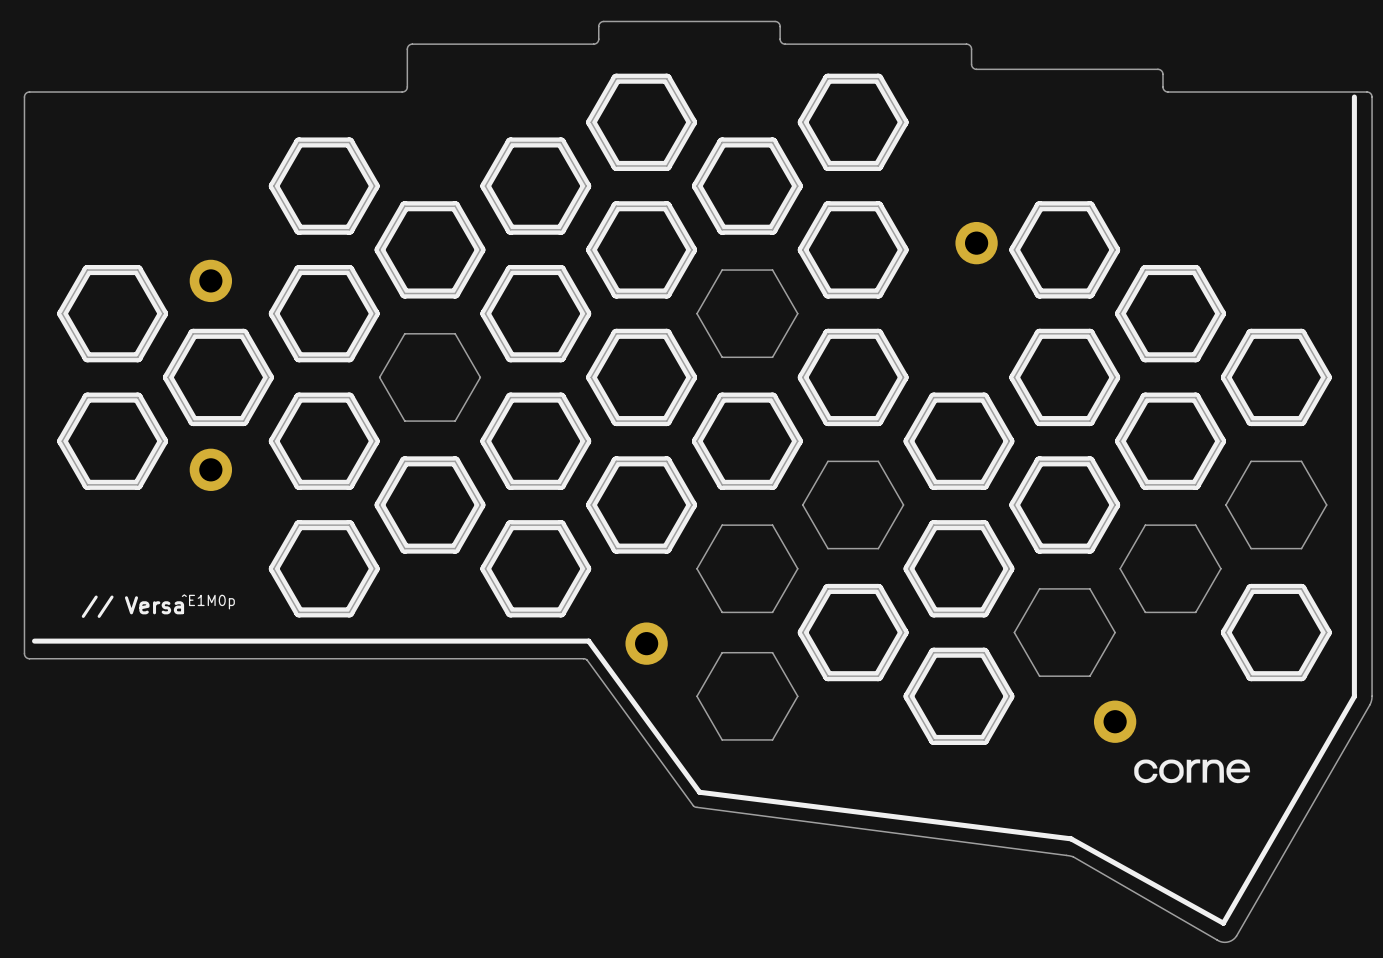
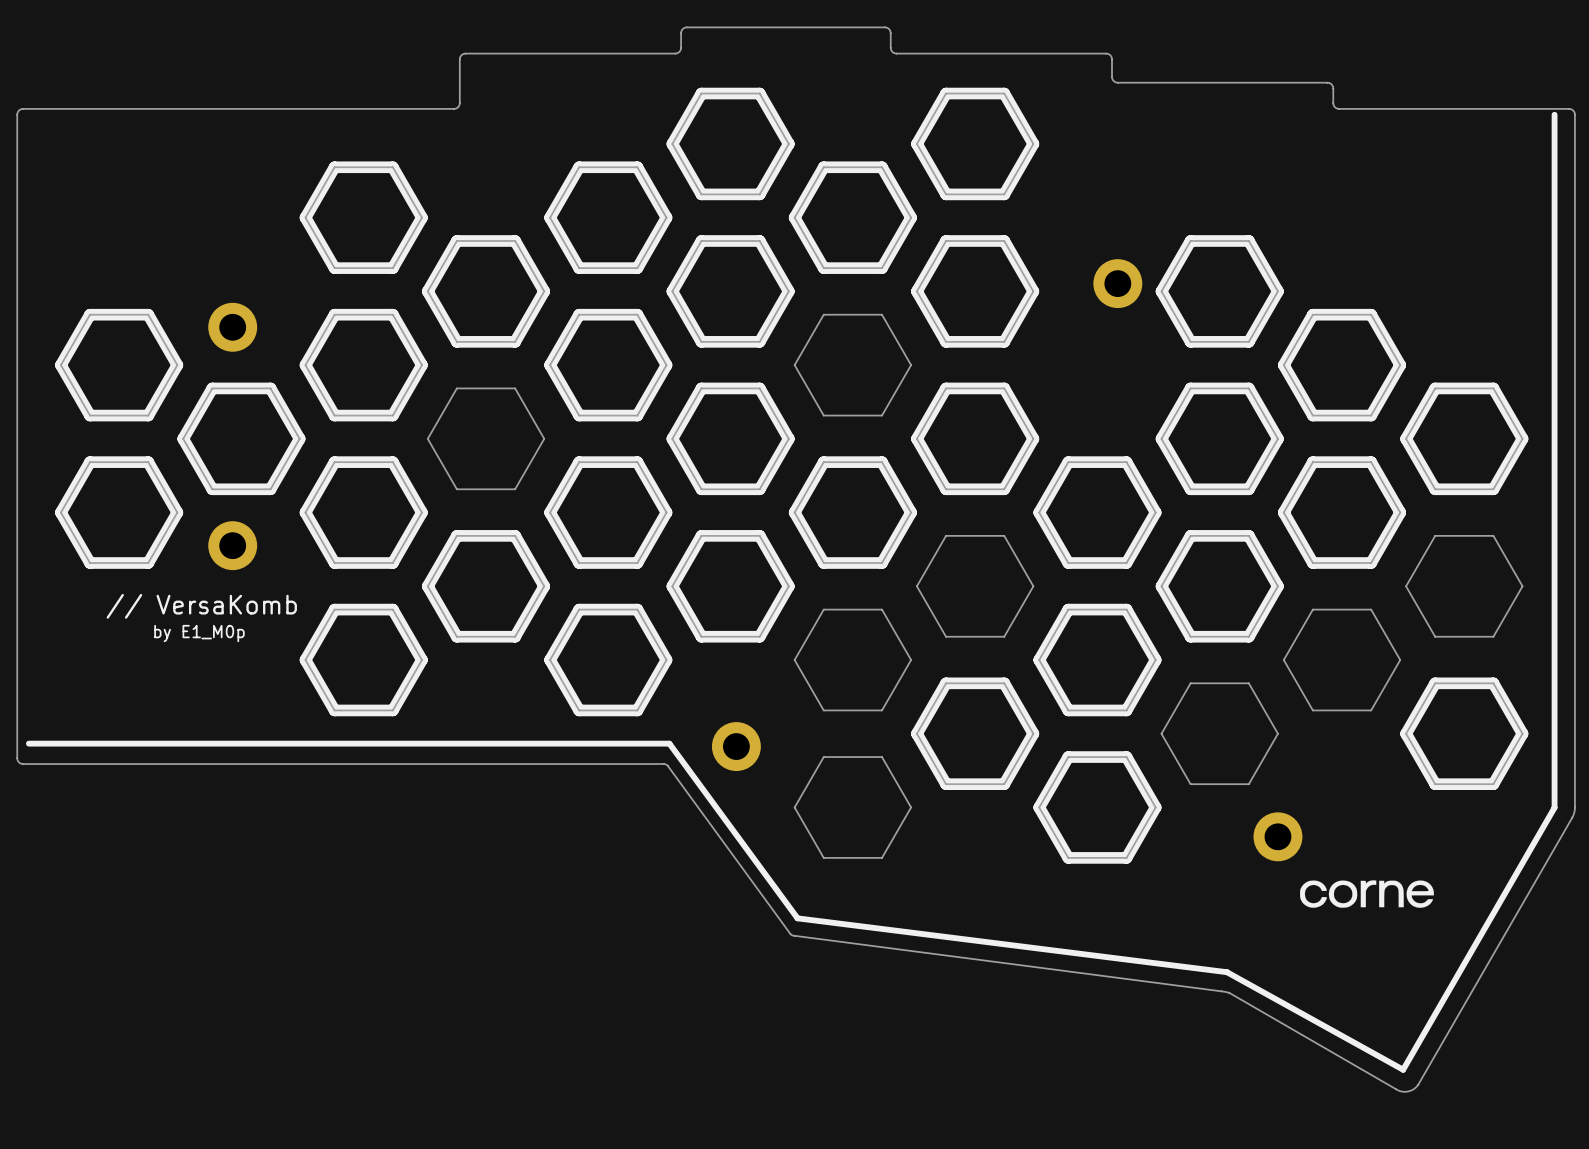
text: none -> // VersaKomb (201, 606)
text: none -> by E1_M0p (199, 633)
text: ^E1M0p (208, 601) -> none
text: // Versa (132, 606) -> none

